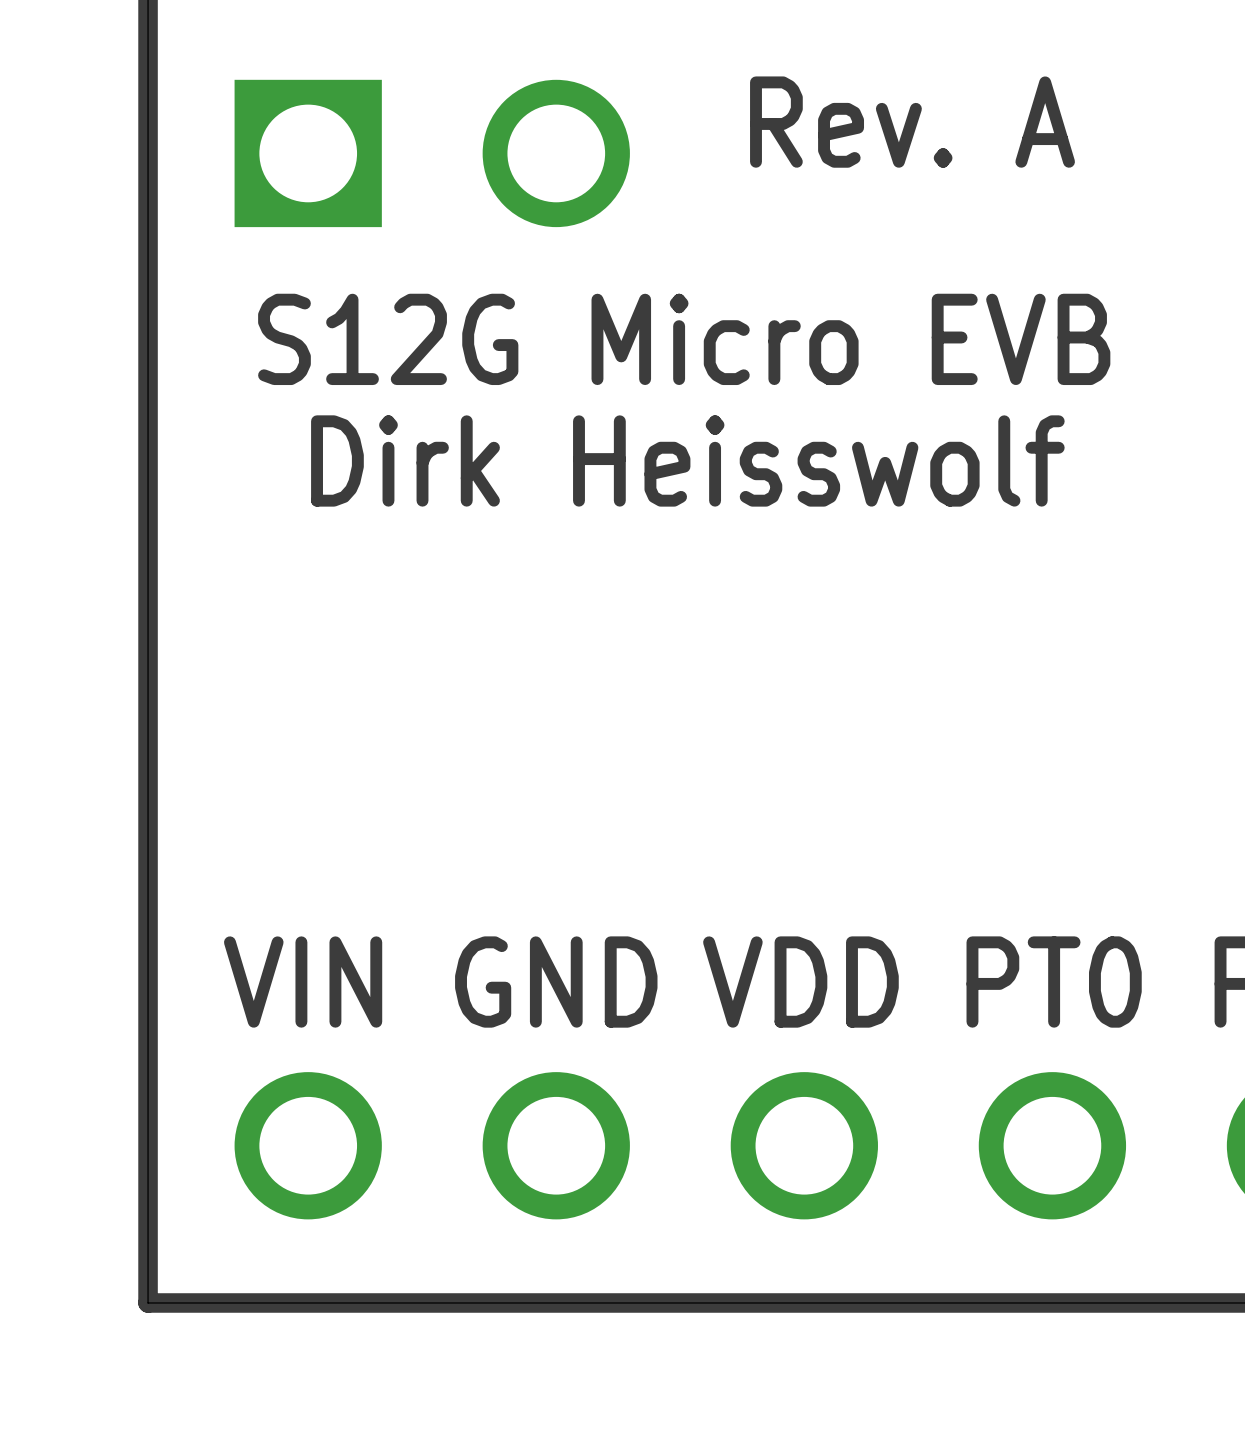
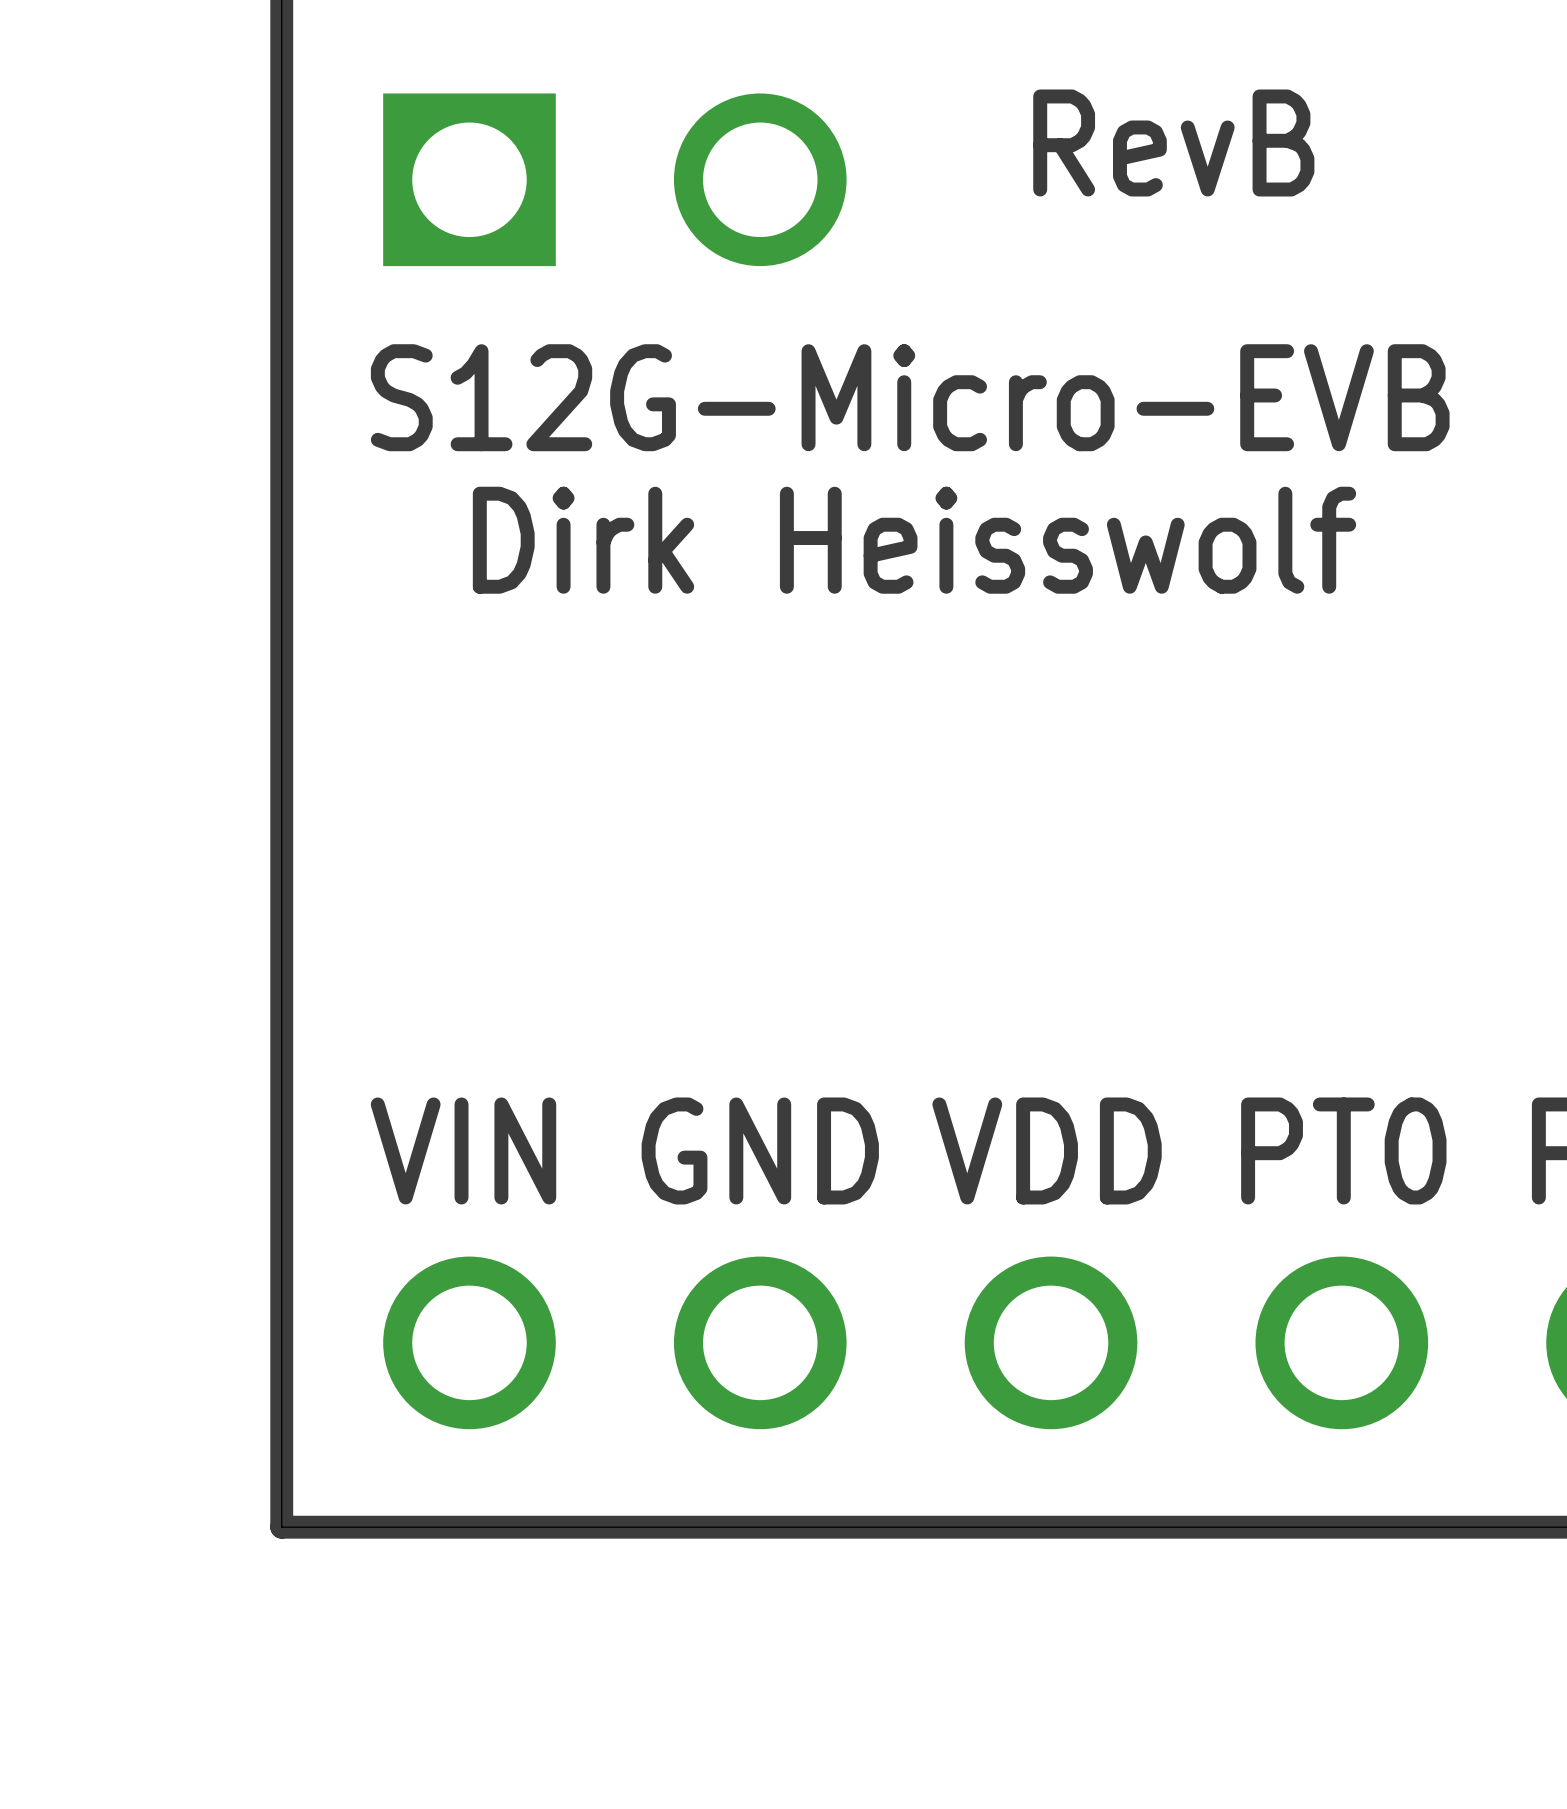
text: Rev. A (912, 122) -> RevB (1173, 142)
text: S12G Micro EVB (684, 339) -> S12G-Micro-EVB (910, 397)

